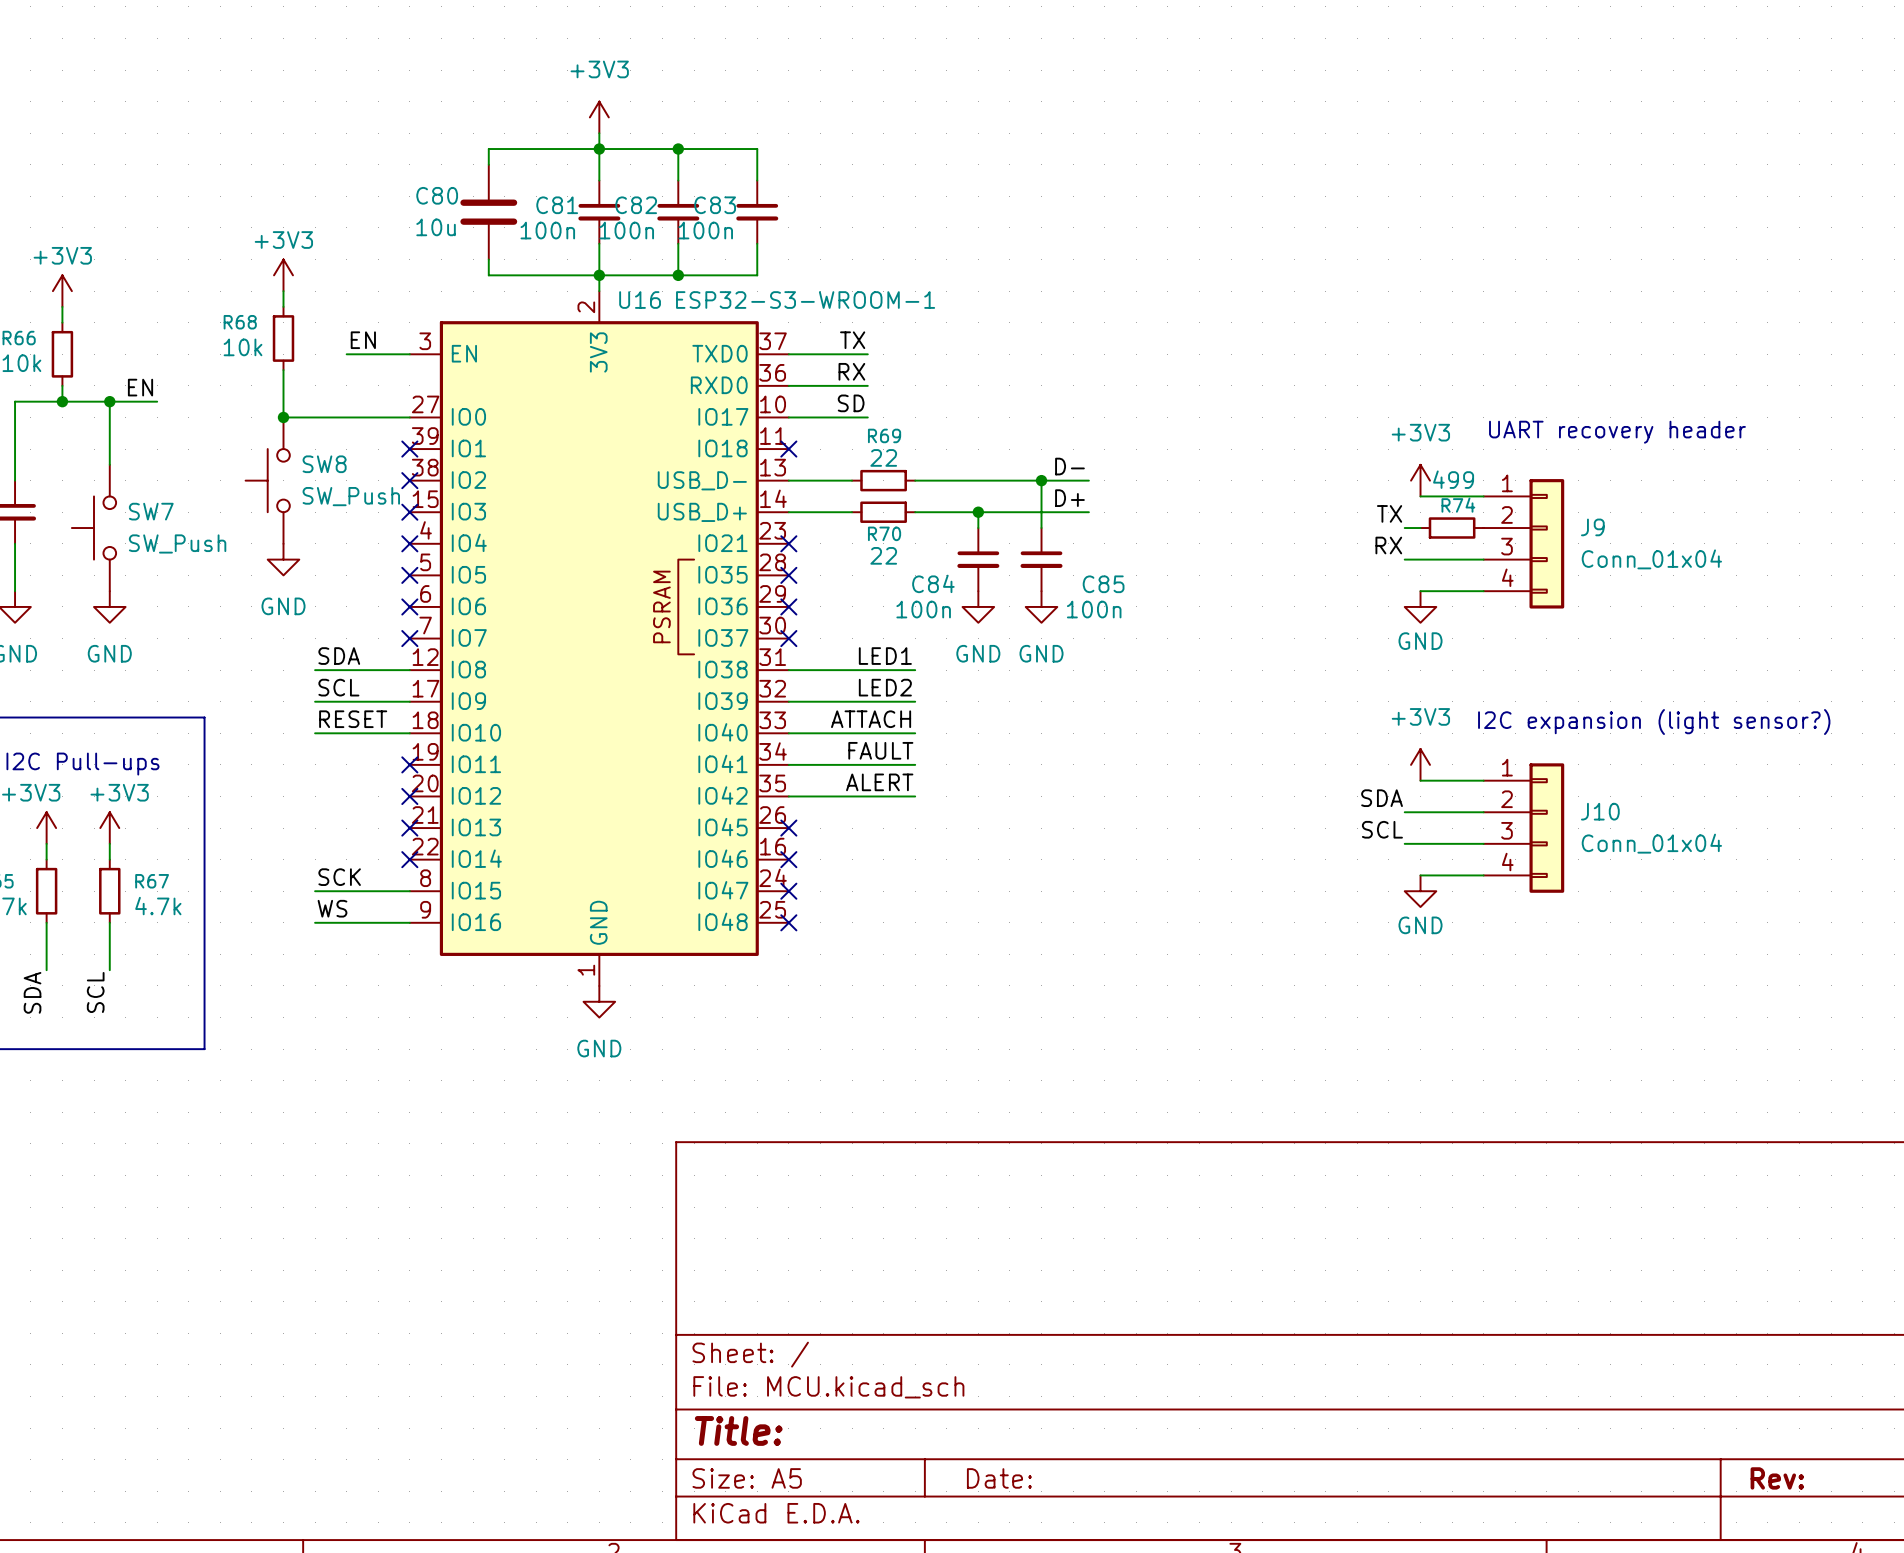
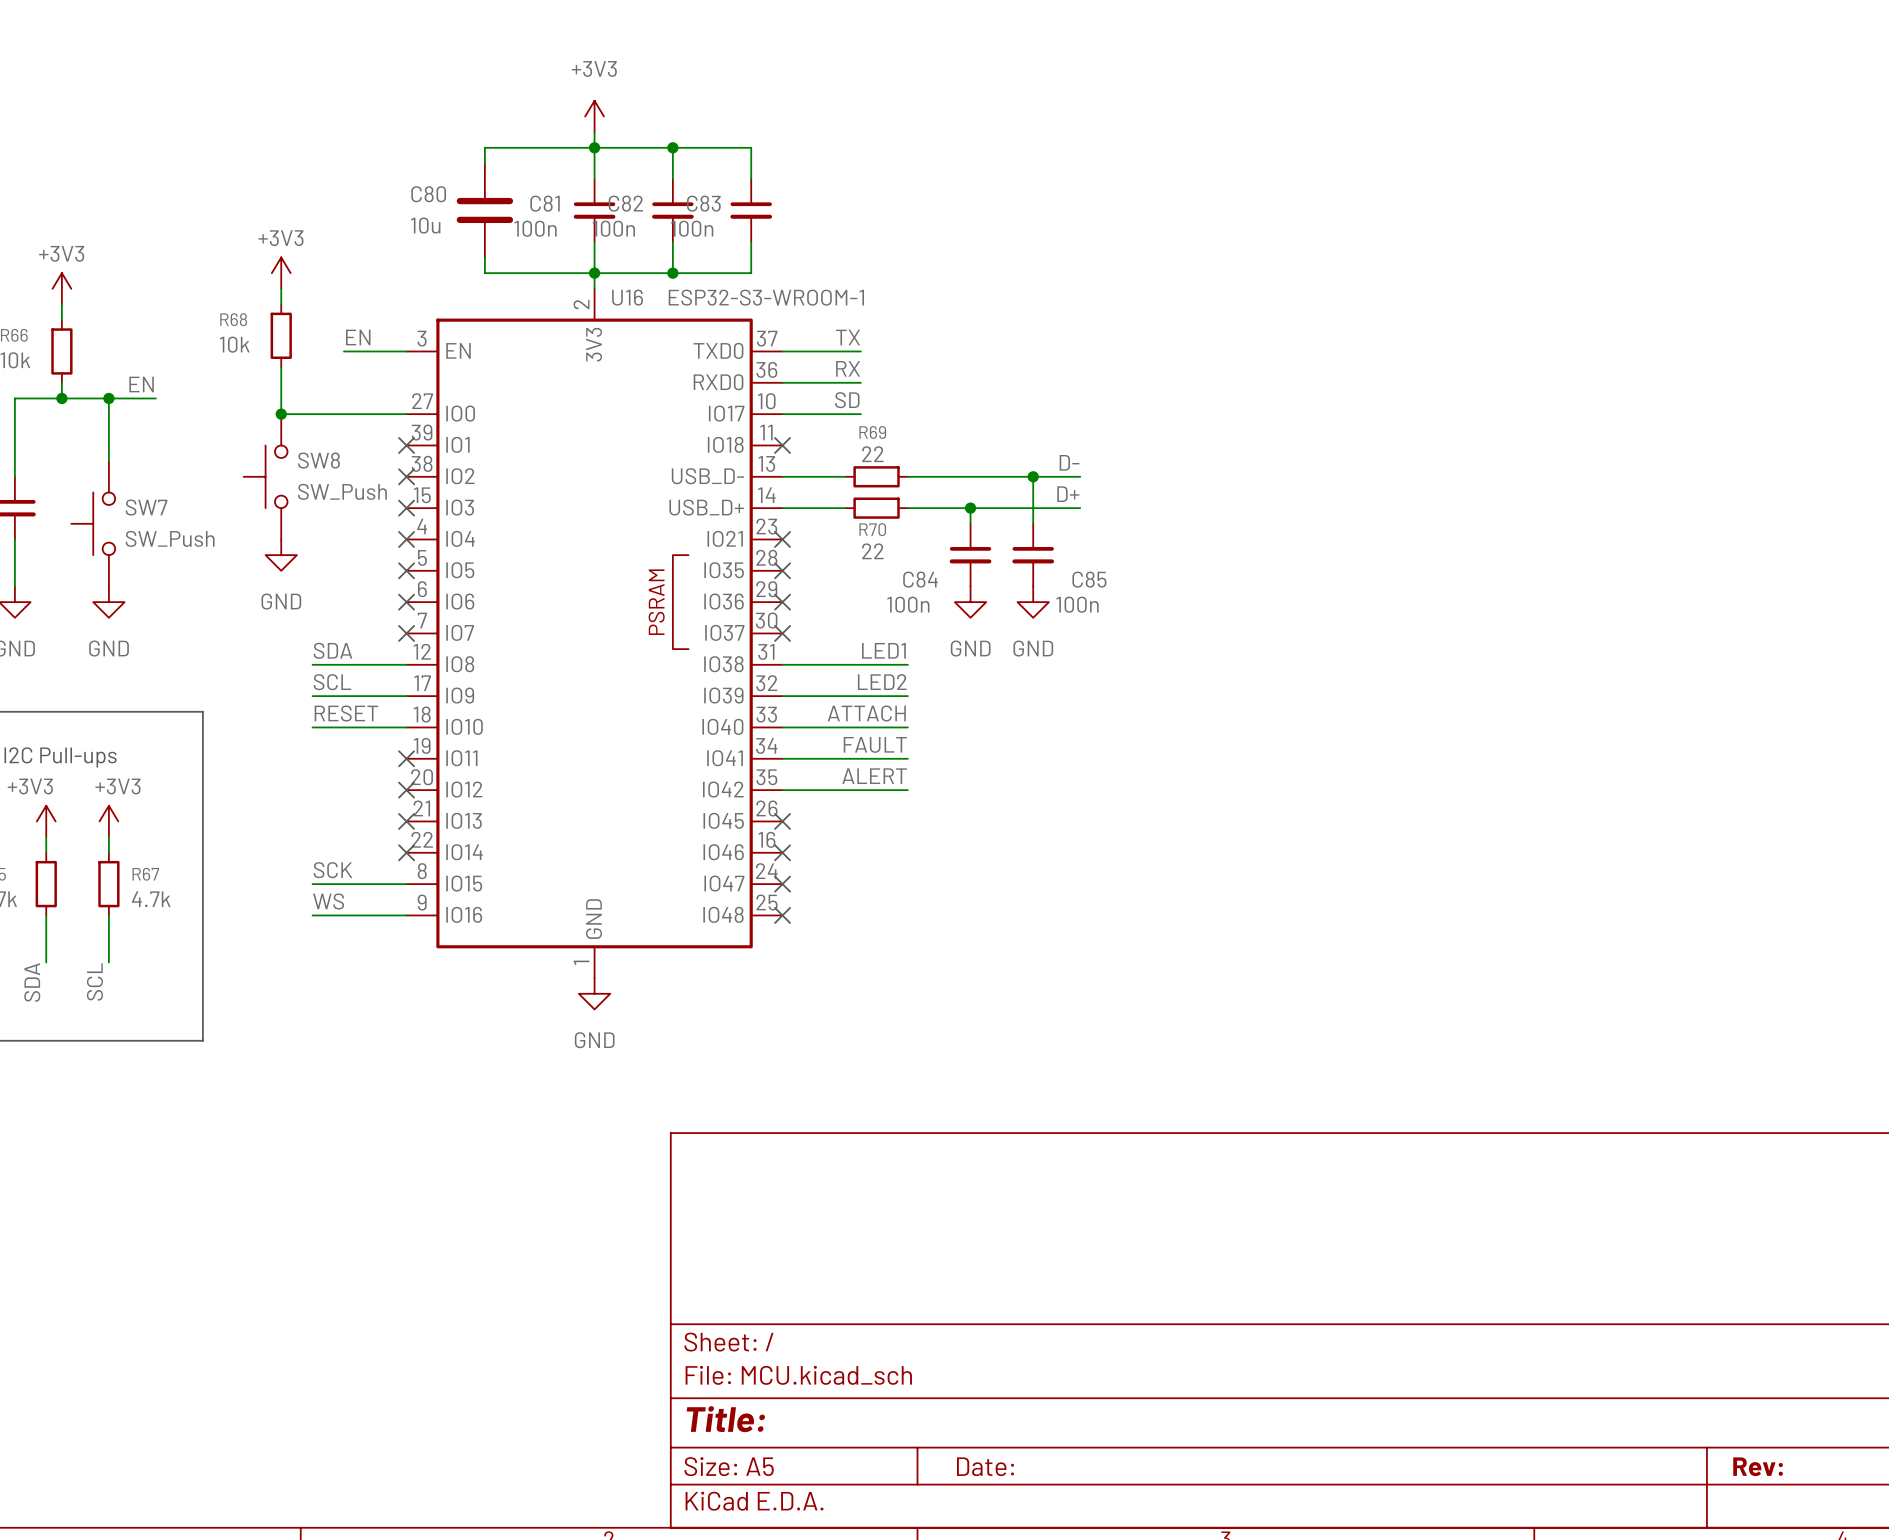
text: UART recovery header (1617, 432) -> none
power symbol: +3V3 (1420, 480) -> none
wire: (1420, 496) (1483, 496) -> none
label: TX (1389, 513) -> none
wire: (1404, 528) (1420, 528) -> none
R74: 499 (1452, 528) -> none
J9: Conn_01x04 (1523, 543) -> none
label: RX (1388, 545) -> none
wire: (1404, 559) (1483, 559) -> none
wire: (1420, 591) (1483, 591) -> none
power symbol: GND (1420, 606) -> none
text: I2C expansion (light sensor?) (1654, 722) -> none
power symbol: +3V3 (1420, 764) -> none
wire: (1420, 780) (1483, 780) -> none
label: SDA (1382, 798) -> none
wire: (1404, 812) (1483, 812) -> none
J10: Conn_01x04 (1523, 828) -> none
label: SCL (1382, 829) -> none
wire: (1404, 843) (1483, 843) -> none
wire: (1420, 875) (1483, 875) -> none
power symbol: GND (1420, 891) -> none

